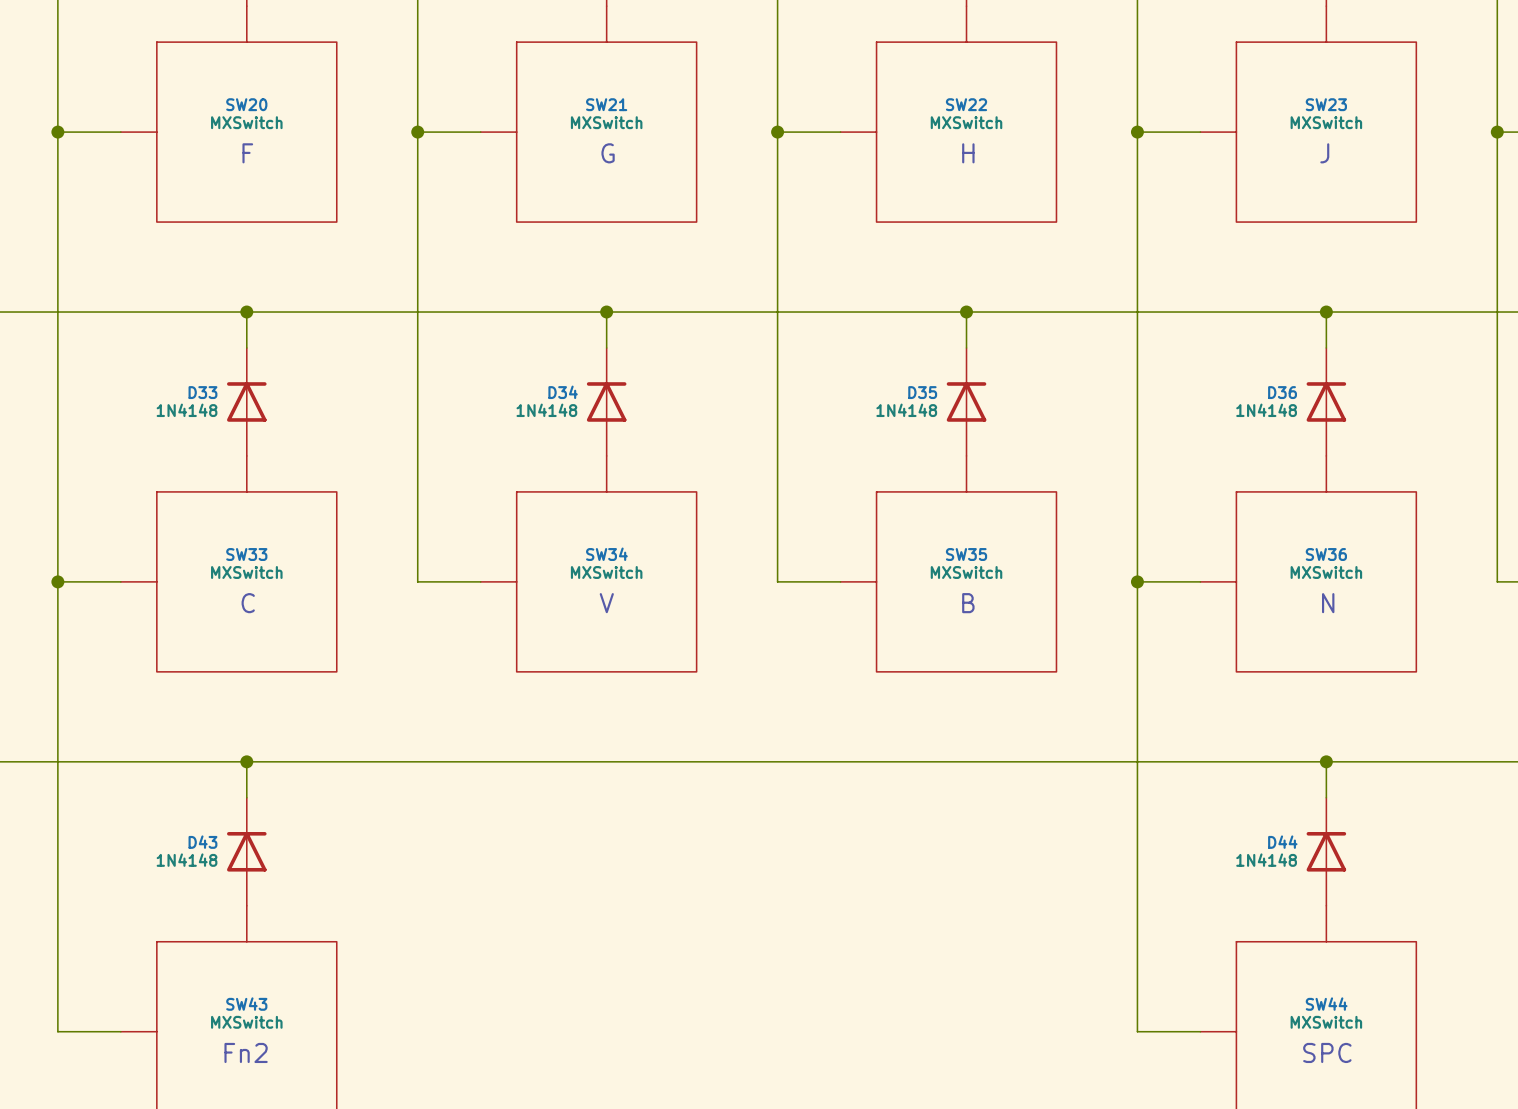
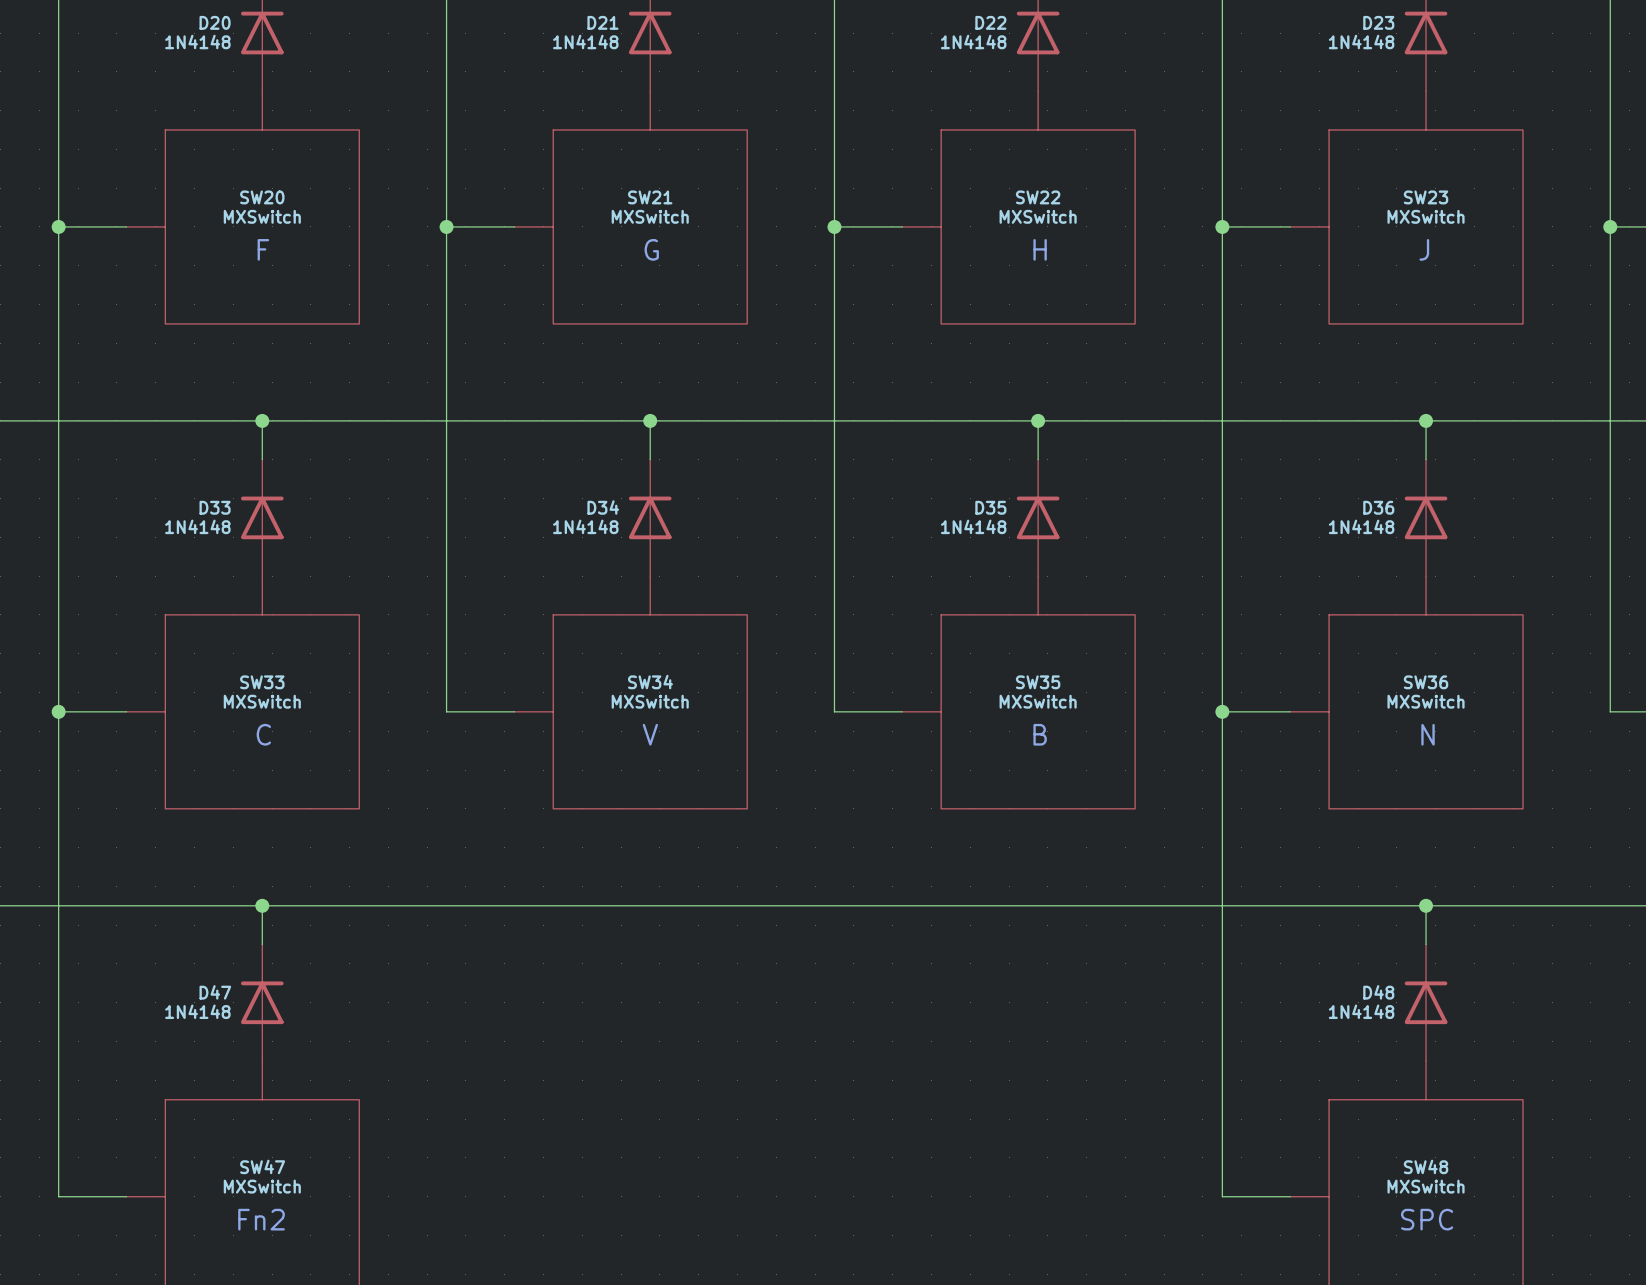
D43 name: D43 (202, 842) -> D47 (215, 992)
D44 name: D44 (1282, 842) -> D48 (1378, 992)
SW43 name: SW43 (246, 1004) -> SW47 (262, 1166)
SW44 name: SW44 (1326, 1004) -> SW48 (1426, 1166)

